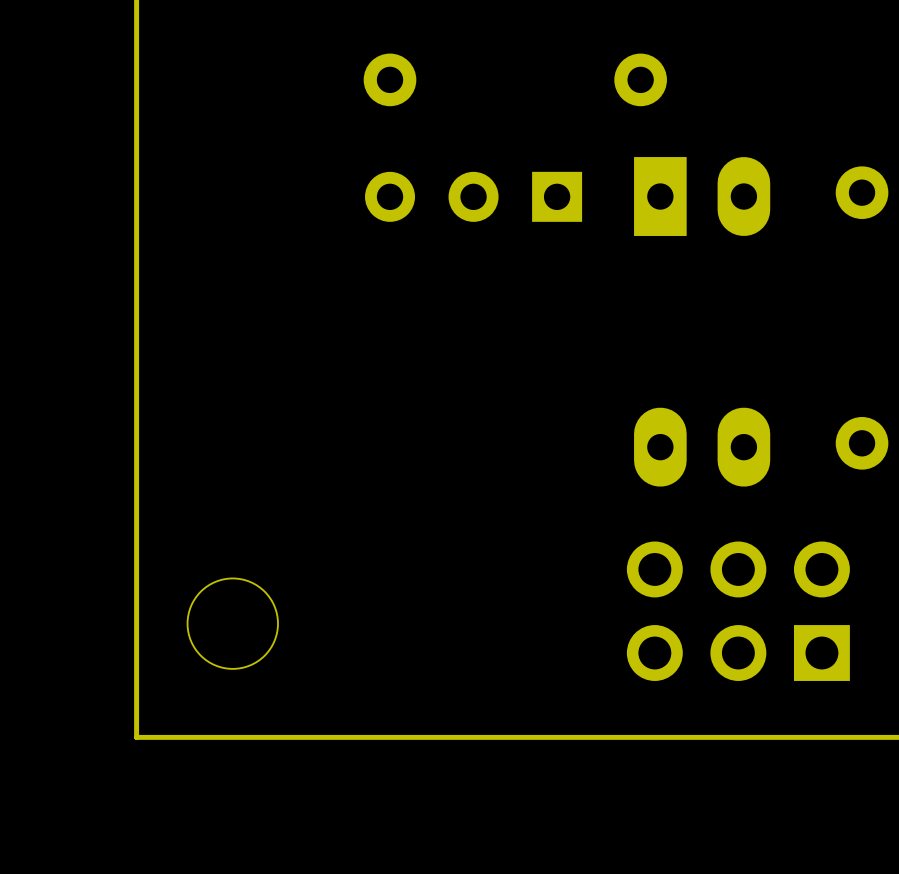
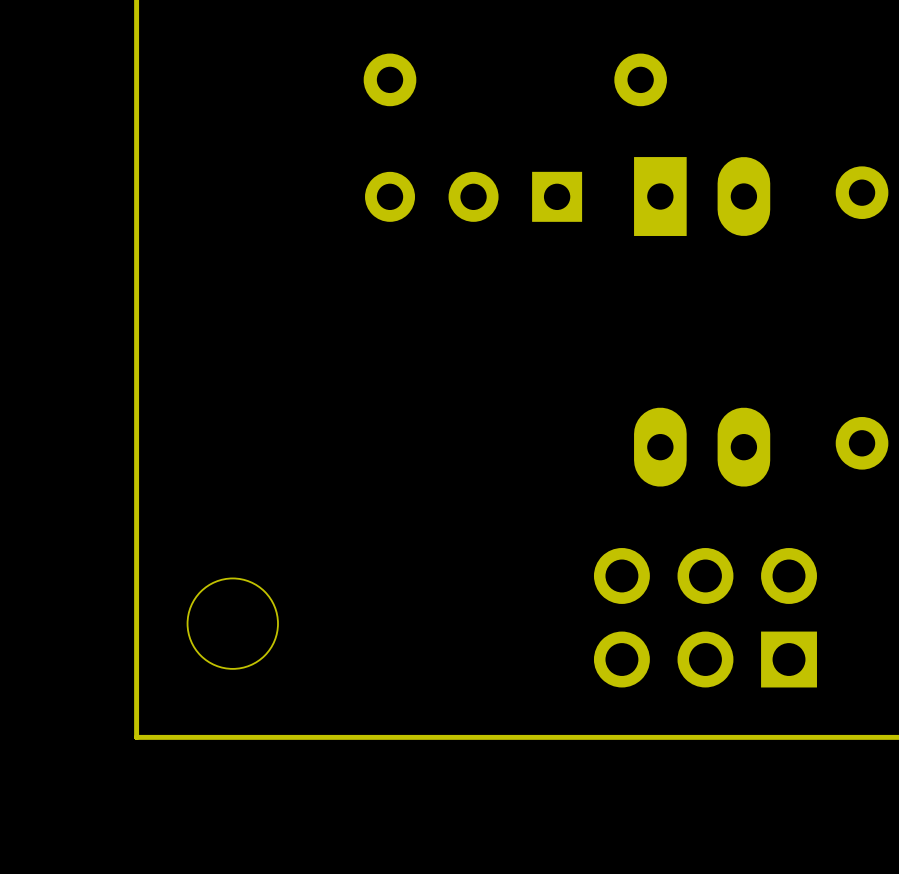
part position: (738, 611) -> (705, 617)

